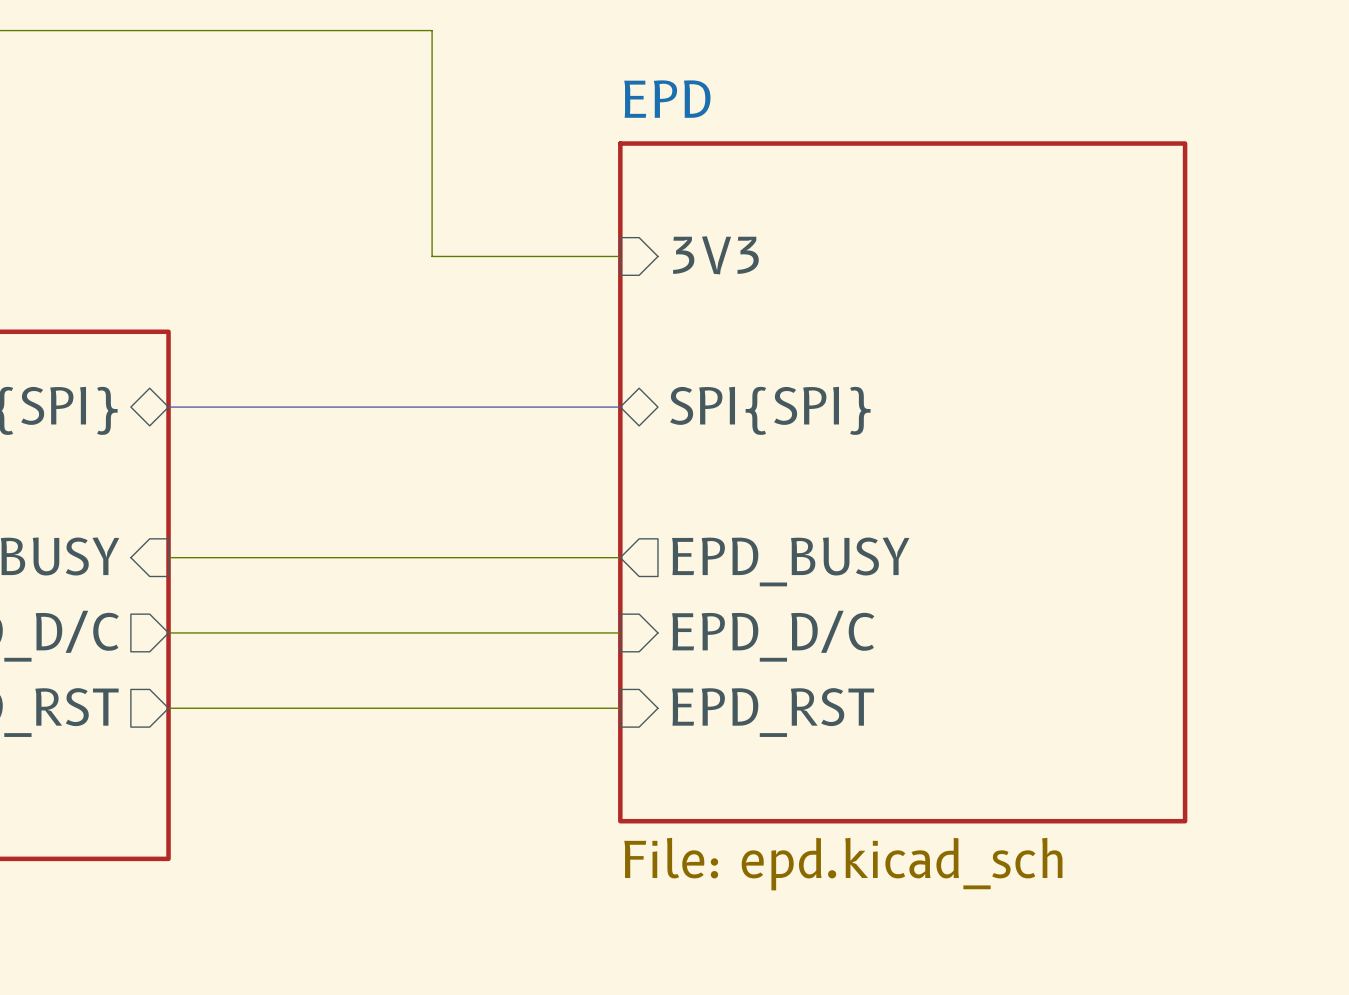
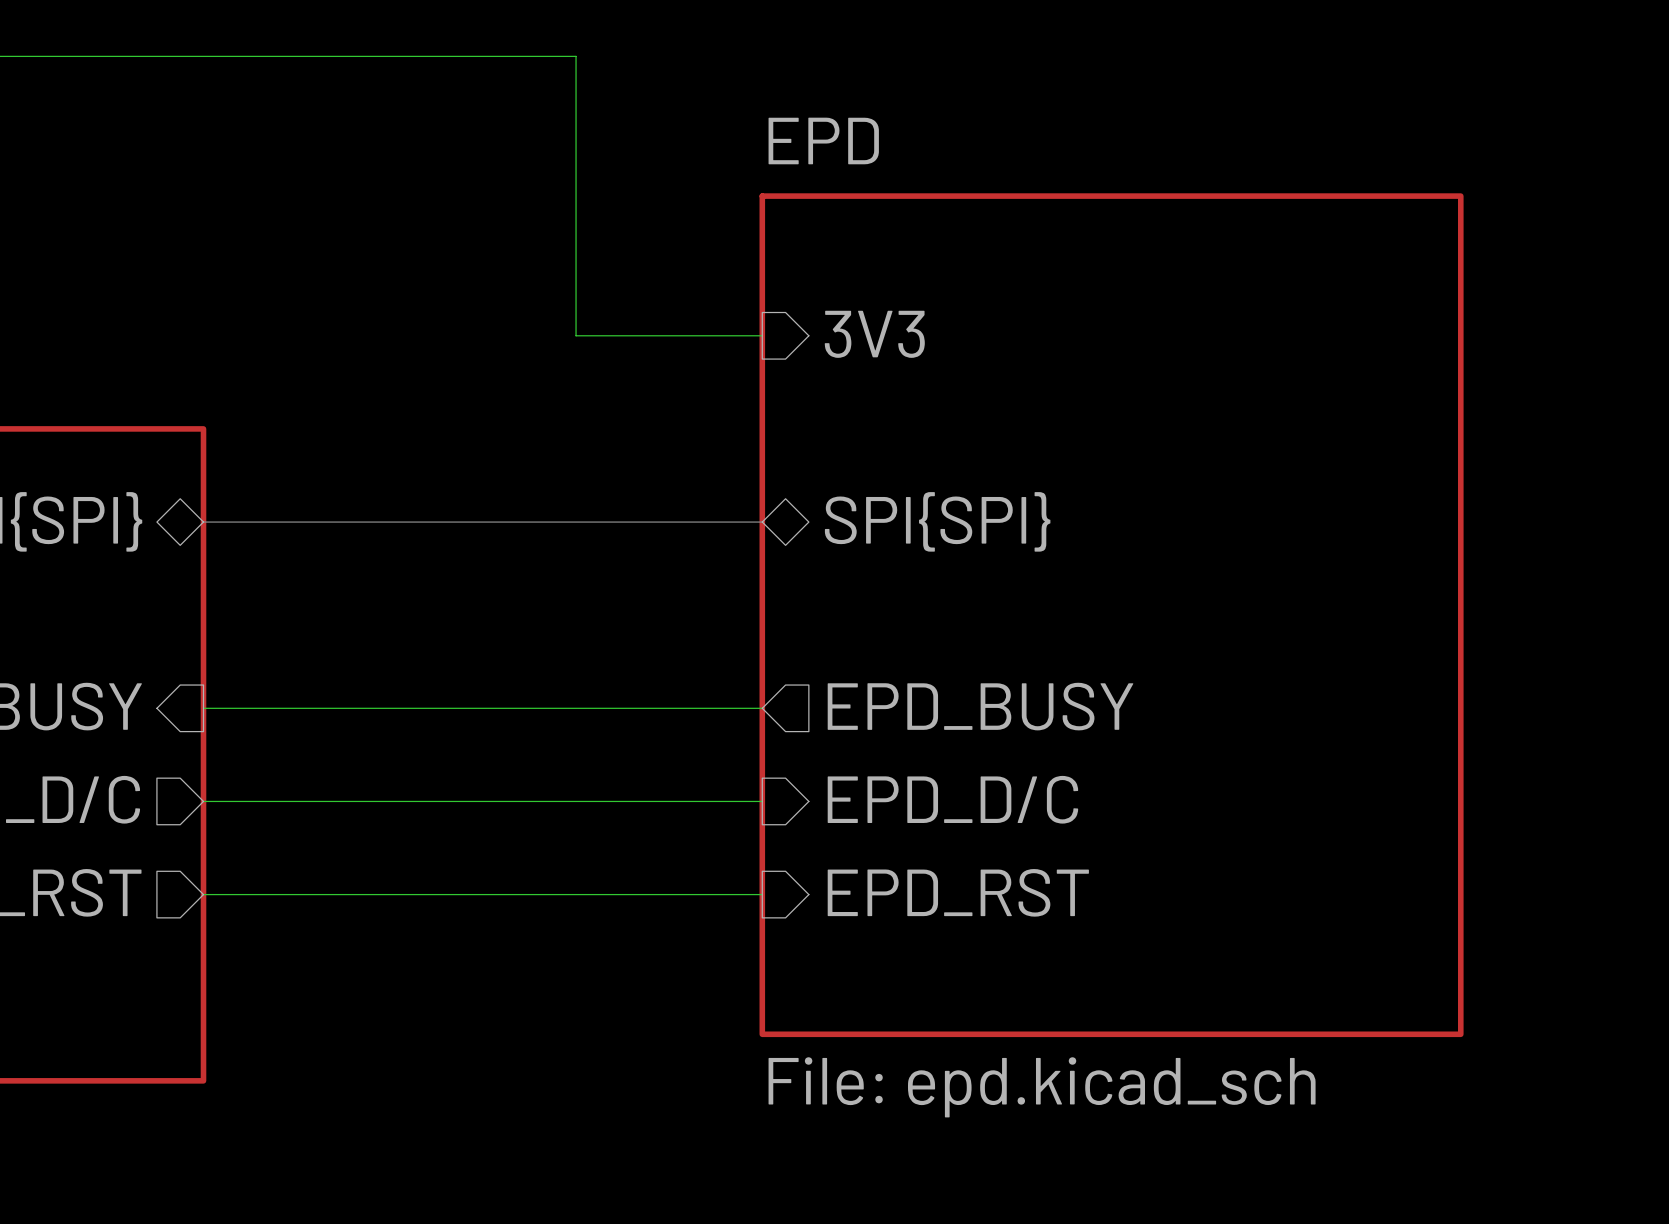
wire: (432, 30) (432, 256) (469, 256) -> (529, 56) (576, 56) (576, 335)

